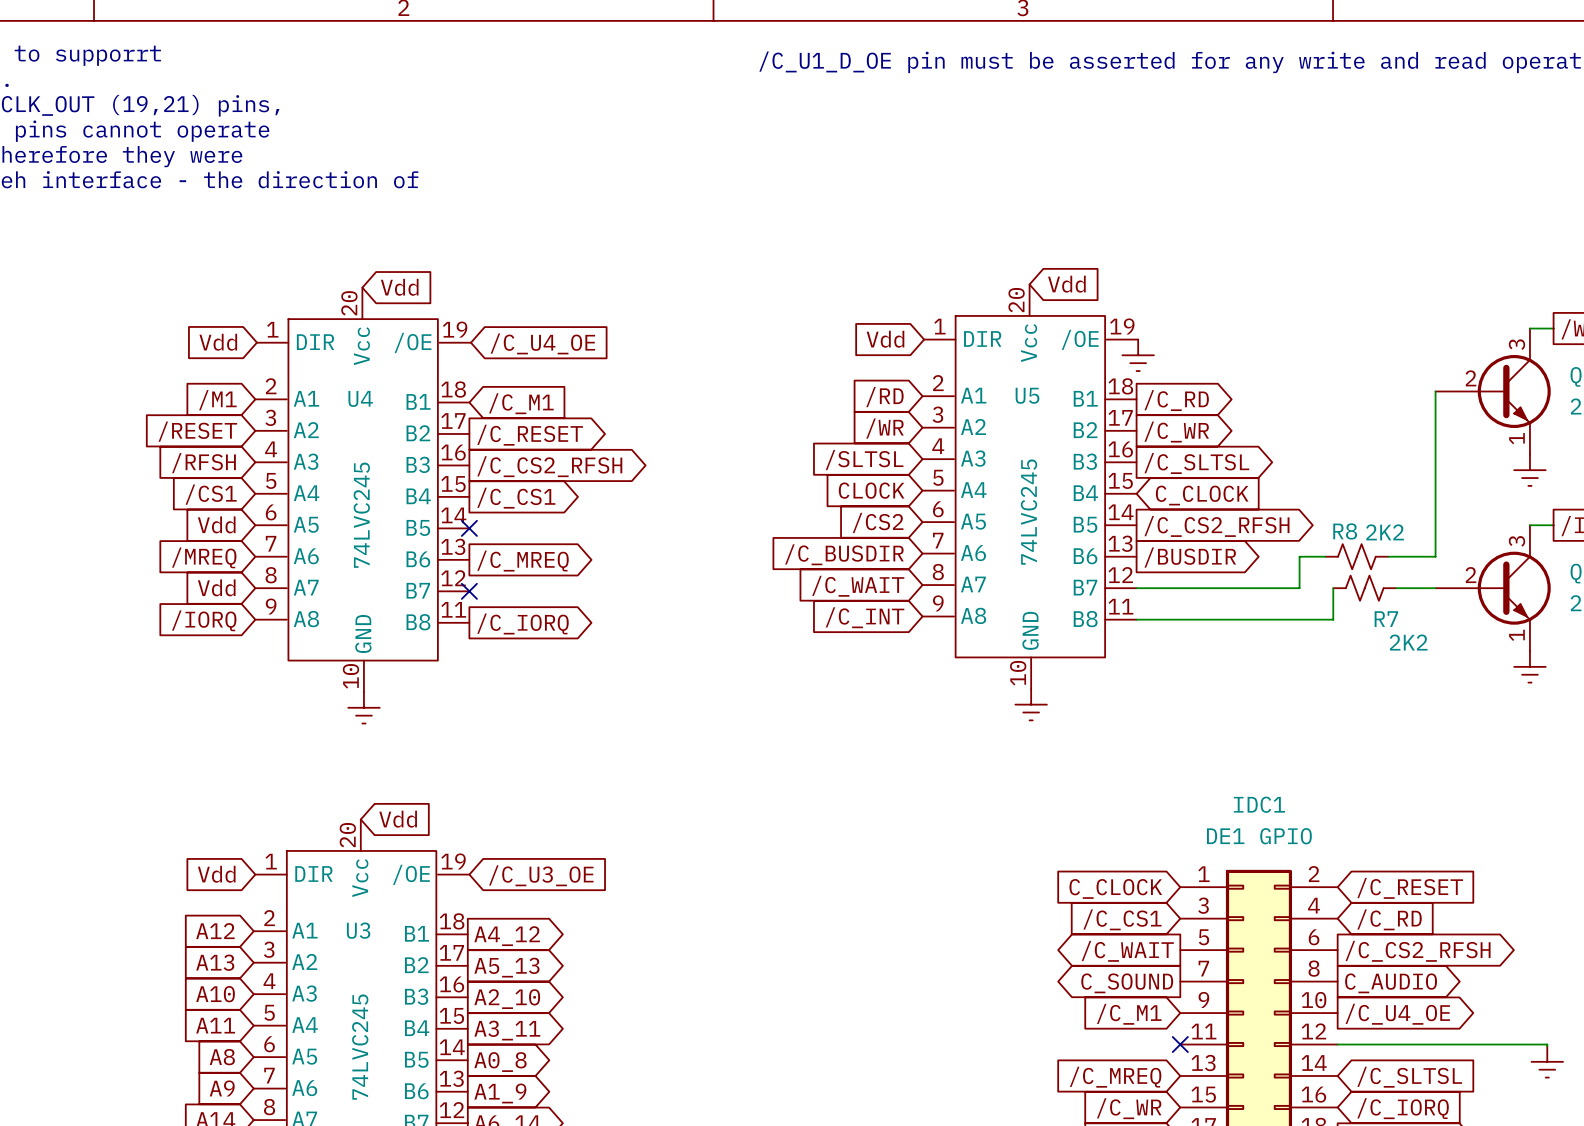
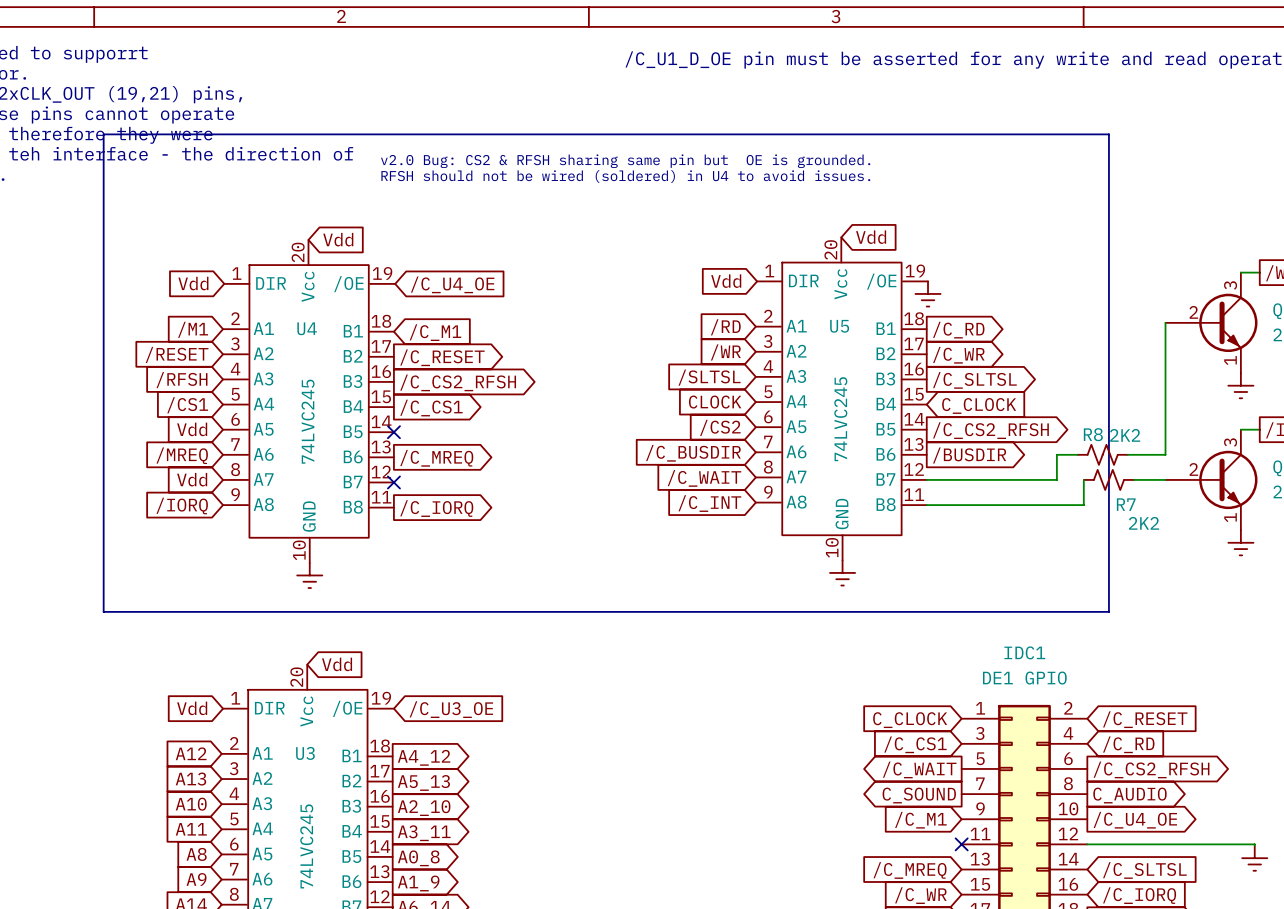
line: none -> (103, 134) (1108, 134) (1108, 611) (103, 611) (103, 134)
text: none -> v2.0 Bug: CS2 & RFSH sharing same pin but OE is grounded. (625, 161)
text: none -> RFSH should not be wired (soldered) in U4 to avoid issues. (625, 176)

